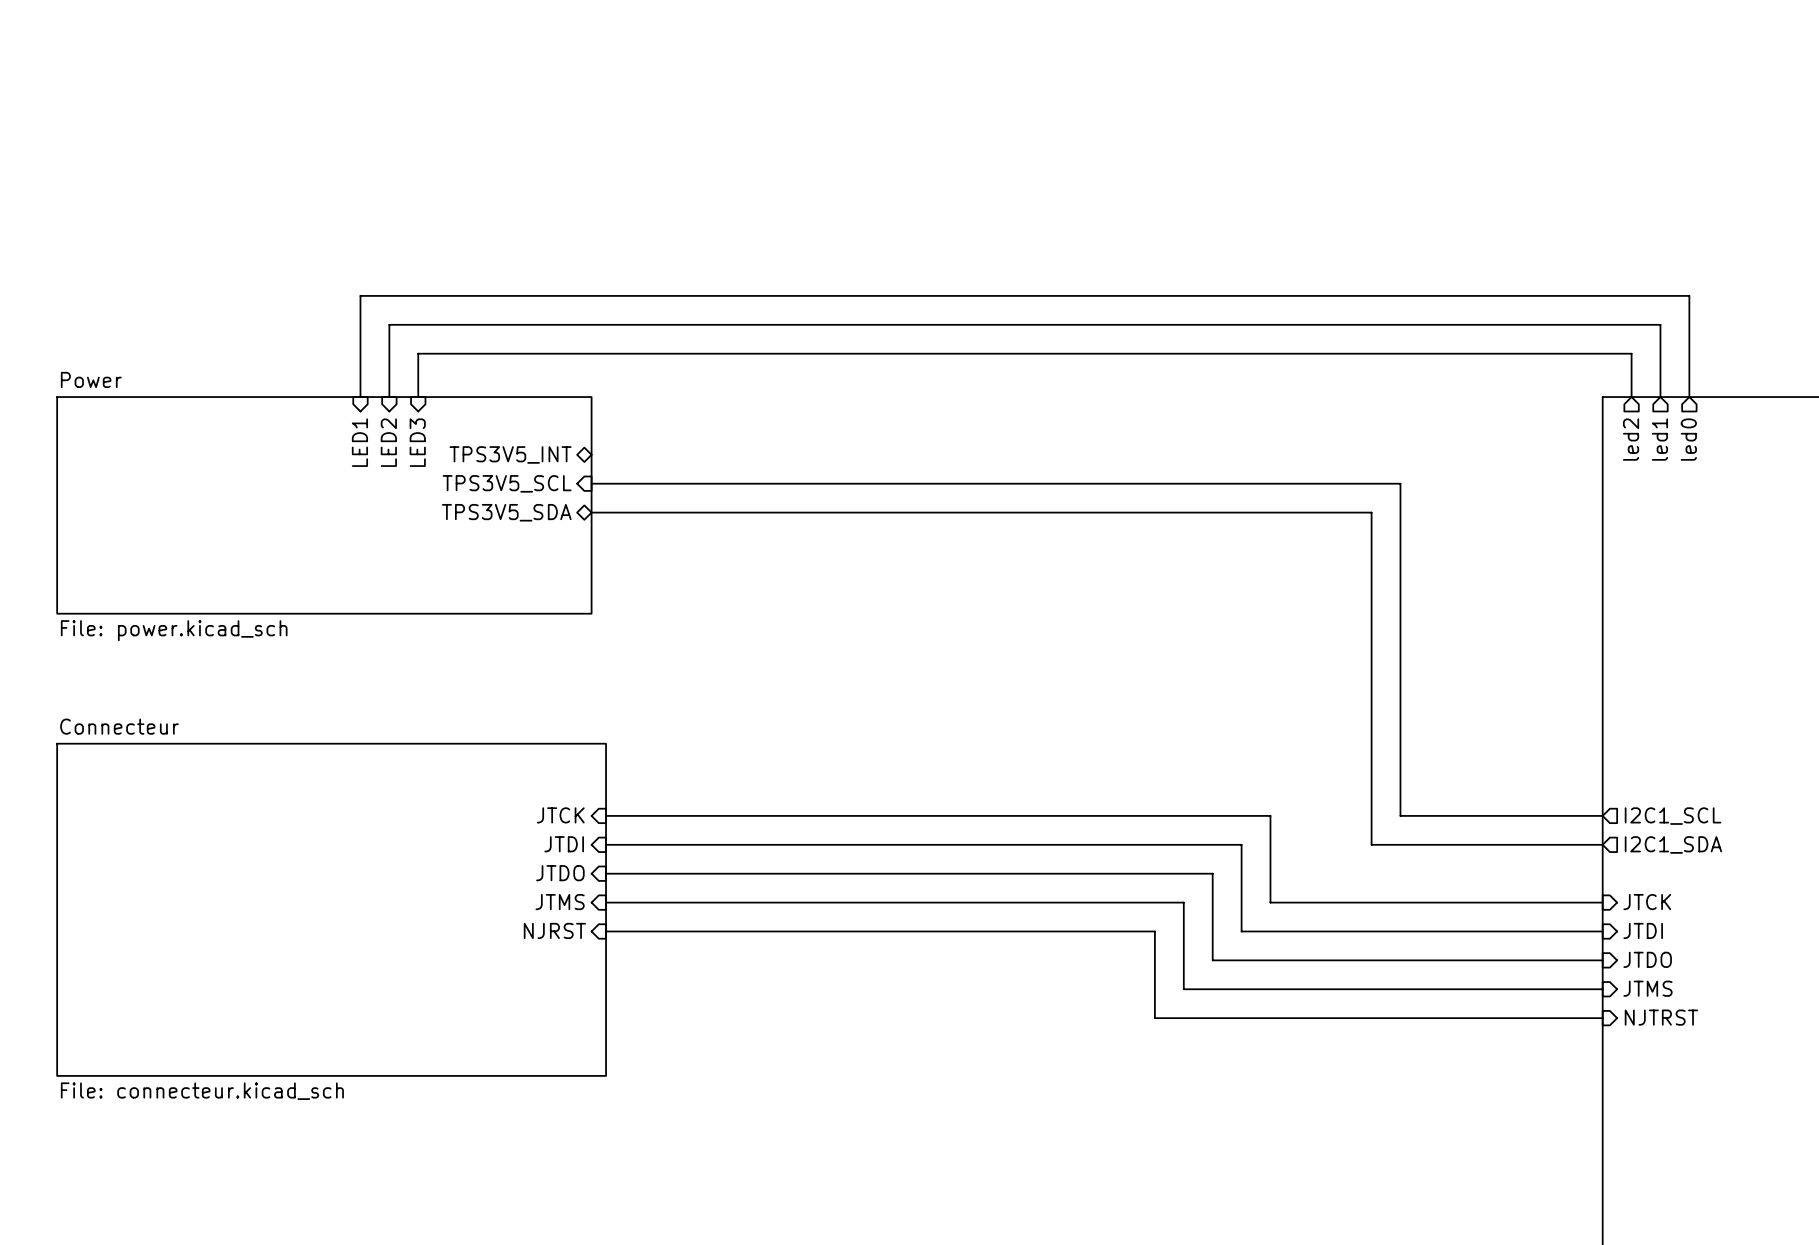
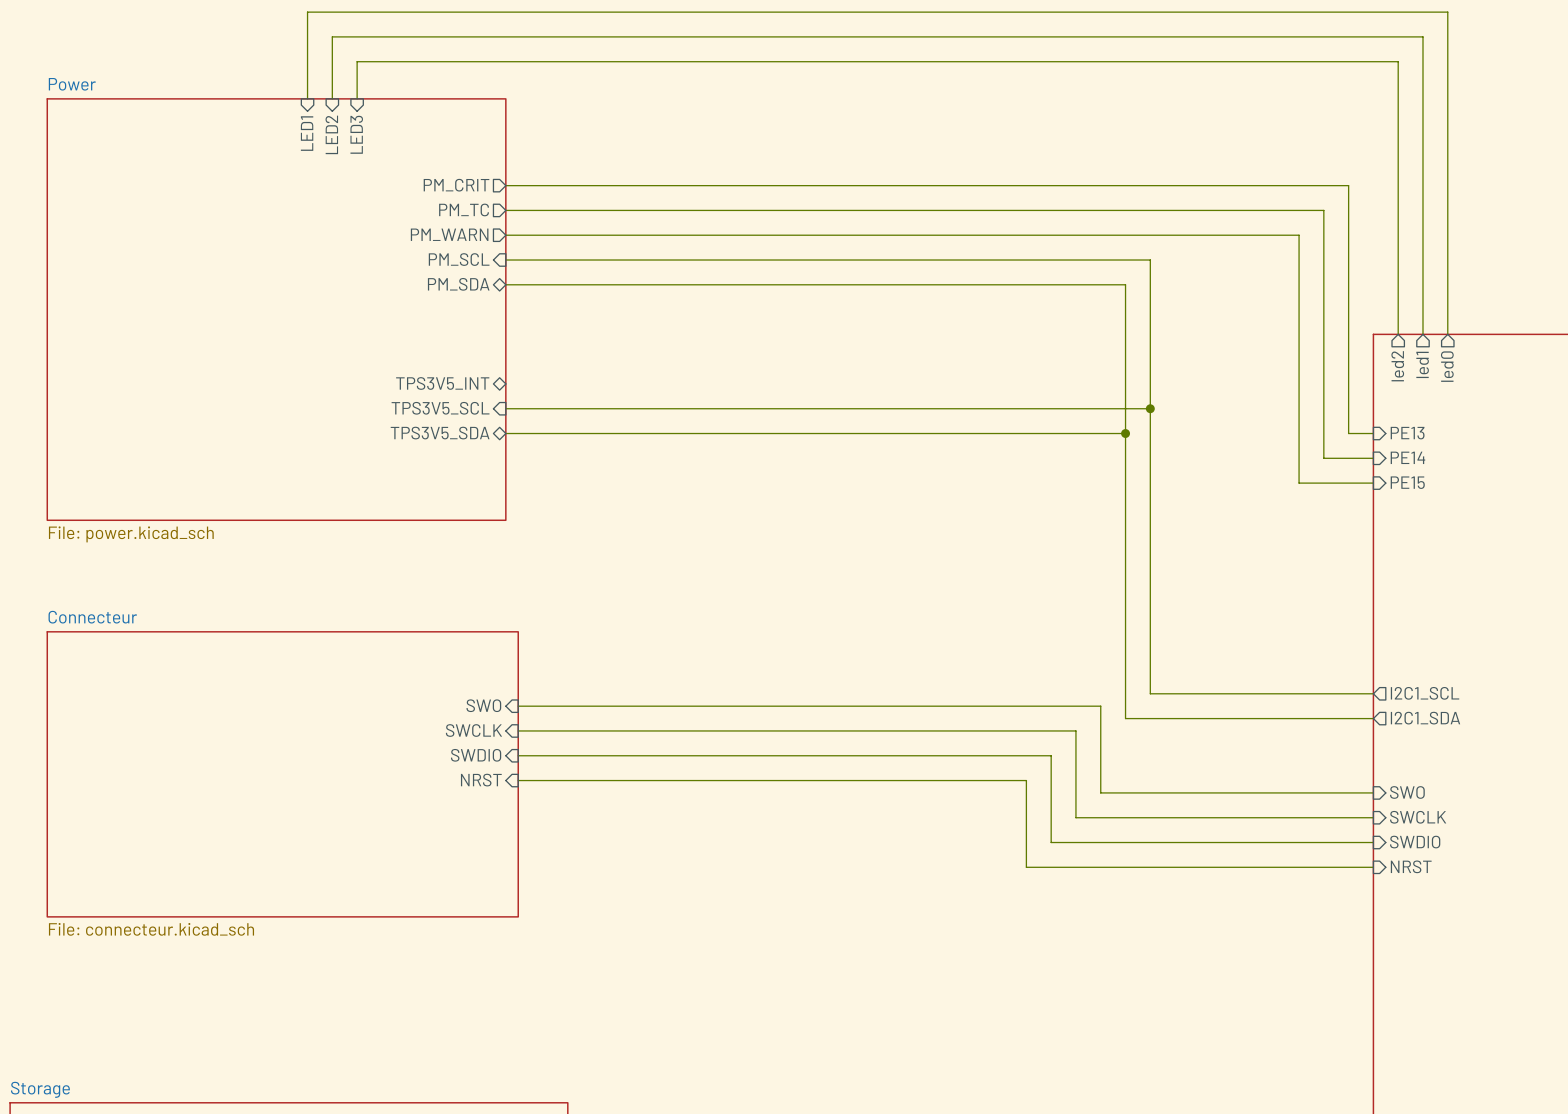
sheet pin: none -> PM_CRIT (456, 185)
wire: none -> (505, 185) (1348, 185) (1348, 433) (1373, 433)
sheet pin: none -> PM_TC (464, 209)
wire: none -> (505, 210) (1323, 210) (1323, 458) (1373, 458)
sheet pin: none -> PM_WARN (449, 234)
wire: none -> (505, 235) (1299, 235) (1299, 483) (1373, 483)
wire: (1689, 295) (360, 295) (360, 397) -> (1447, 247) (1447, 12) (307, 12) (307, 98)
sheet pin: none -> PM_SCL (459, 259)
wire: (1660, 324) (389, 324) (389, 397) -> (1422, 272) (1422, 36) (332, 36) (332, 98)
sheet pin: none -> PM_SDA (458, 284)
wire: (1631, 353) (418, 353) (418, 397) -> (1398, 297) (1398, 61) (357, 61) (357, 98)
sheet Power: none -> File: power.kicad_sch (276, 309)
sheet pin position: LED1 (359, 442) -> LED1 (307, 133)
sheet pin position: LED2 (388, 442) -> LED2 (331, 134)
sheet pin position: LED3 (417, 442) -> LED3 (356, 134)
wire: (1342, 483) (1400, 483) (1400, 815) -> (505, 260) (1150, 260) (1150, 693) (1199, 693)
junction: none -> (1150, 408)
sheet Power: File: power.kicad_sch (324, 505) -> none
wire: (1313, 512) (1371, 512) (1371, 844) -> (505, 284) (1125, 284) (1125, 718) (1175, 718)
junction: none -> (1125, 433)
sheet pin: none -> PE13 (1407, 433)
sheet pin: none -> PE14 (1407, 457)
sheet pin: none -> PE15 (1407, 482)
sheet pin: JTCK (560, 815) -> none
wire: (606, 815) (1270, 815) (1270, 902) (1602, 902) -> none
sheet pin: none -> SWO (483, 705)
sheet pin: JTDI (564, 844) -> none
wire: (606, 844) (1241, 844) (1241, 931) (1284, 931) -> (518, 706) (1100, 706) (1100, 792)
sheet pin: none -> SWCLK (473, 730)
sheet pin: JTDO (560, 873) -> none
wire: (606, 873) (1212, 873) (1212, 960) (1256, 960) -> (518, 730) (1075, 730) (1075, 817)
sheet pin: none -> SWDIO (476, 755)
sheet pin: JTMS (560, 902) -> none
wire: (606, 902) (1183, 902) (1183, 989) (1227, 989) -> (518, 755) (1051, 755) (1051, 842)
sheet pin: JTCK (1647, 902) -> none
sheet pin: NJRST (554, 930) -> NRST (481, 780)
sheet pin: JTDI (1643, 930) -> SWO (1407, 792)
wire: (606, 931) (1154, 931) (1154, 1018) (1198, 1018) -> (518, 780) (1026, 780) (1026, 867)
sheet pin: JTDO (1647, 959) -> SWCLK (1418, 817)
sheet pin: JTMS (1647, 988) -> SWDIO (1415, 842)
sheet pin: NJTRST (1661, 1017) -> NRST (1411, 866)

